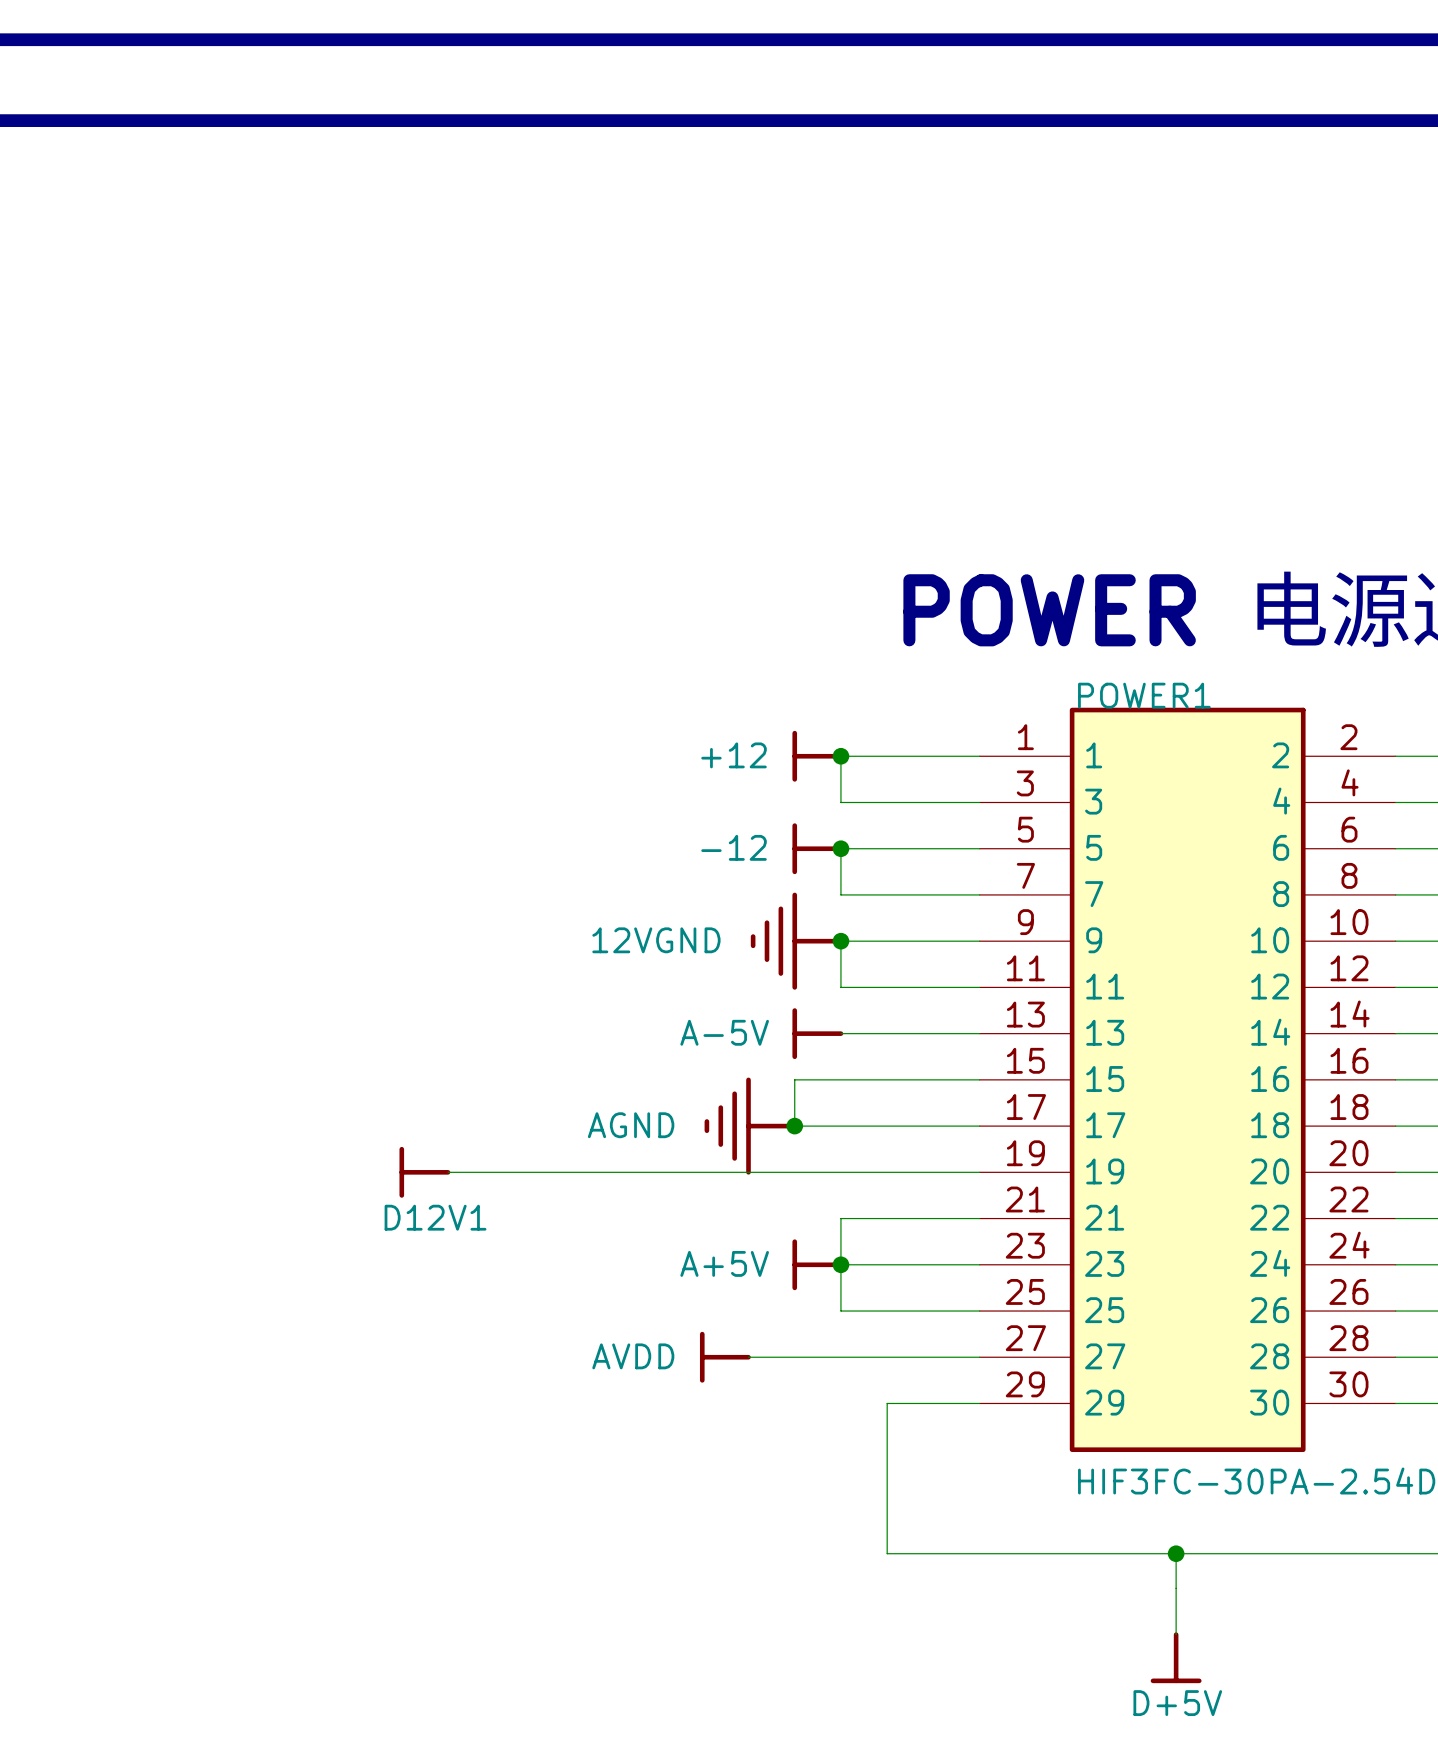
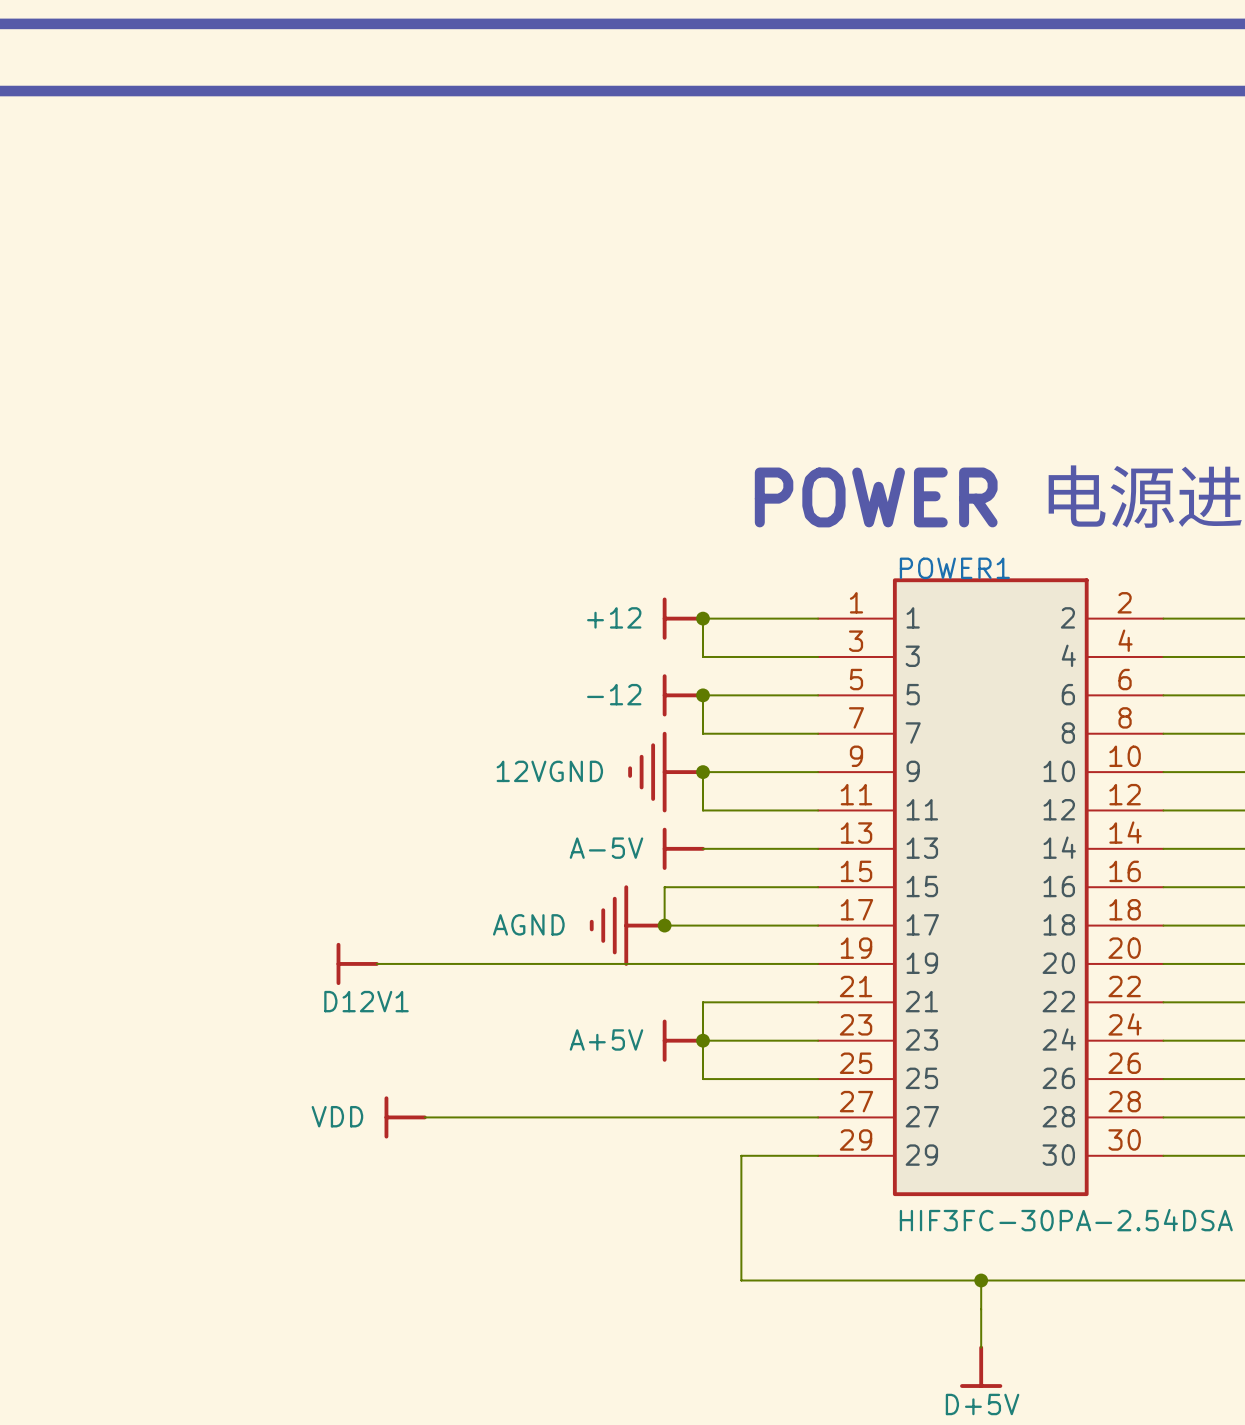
power symbol: none -> VDD (405, 1117)
wire: none -> (424, 1117) (626, 1117)
power symbol: AVDD (725, 1357) -> none

